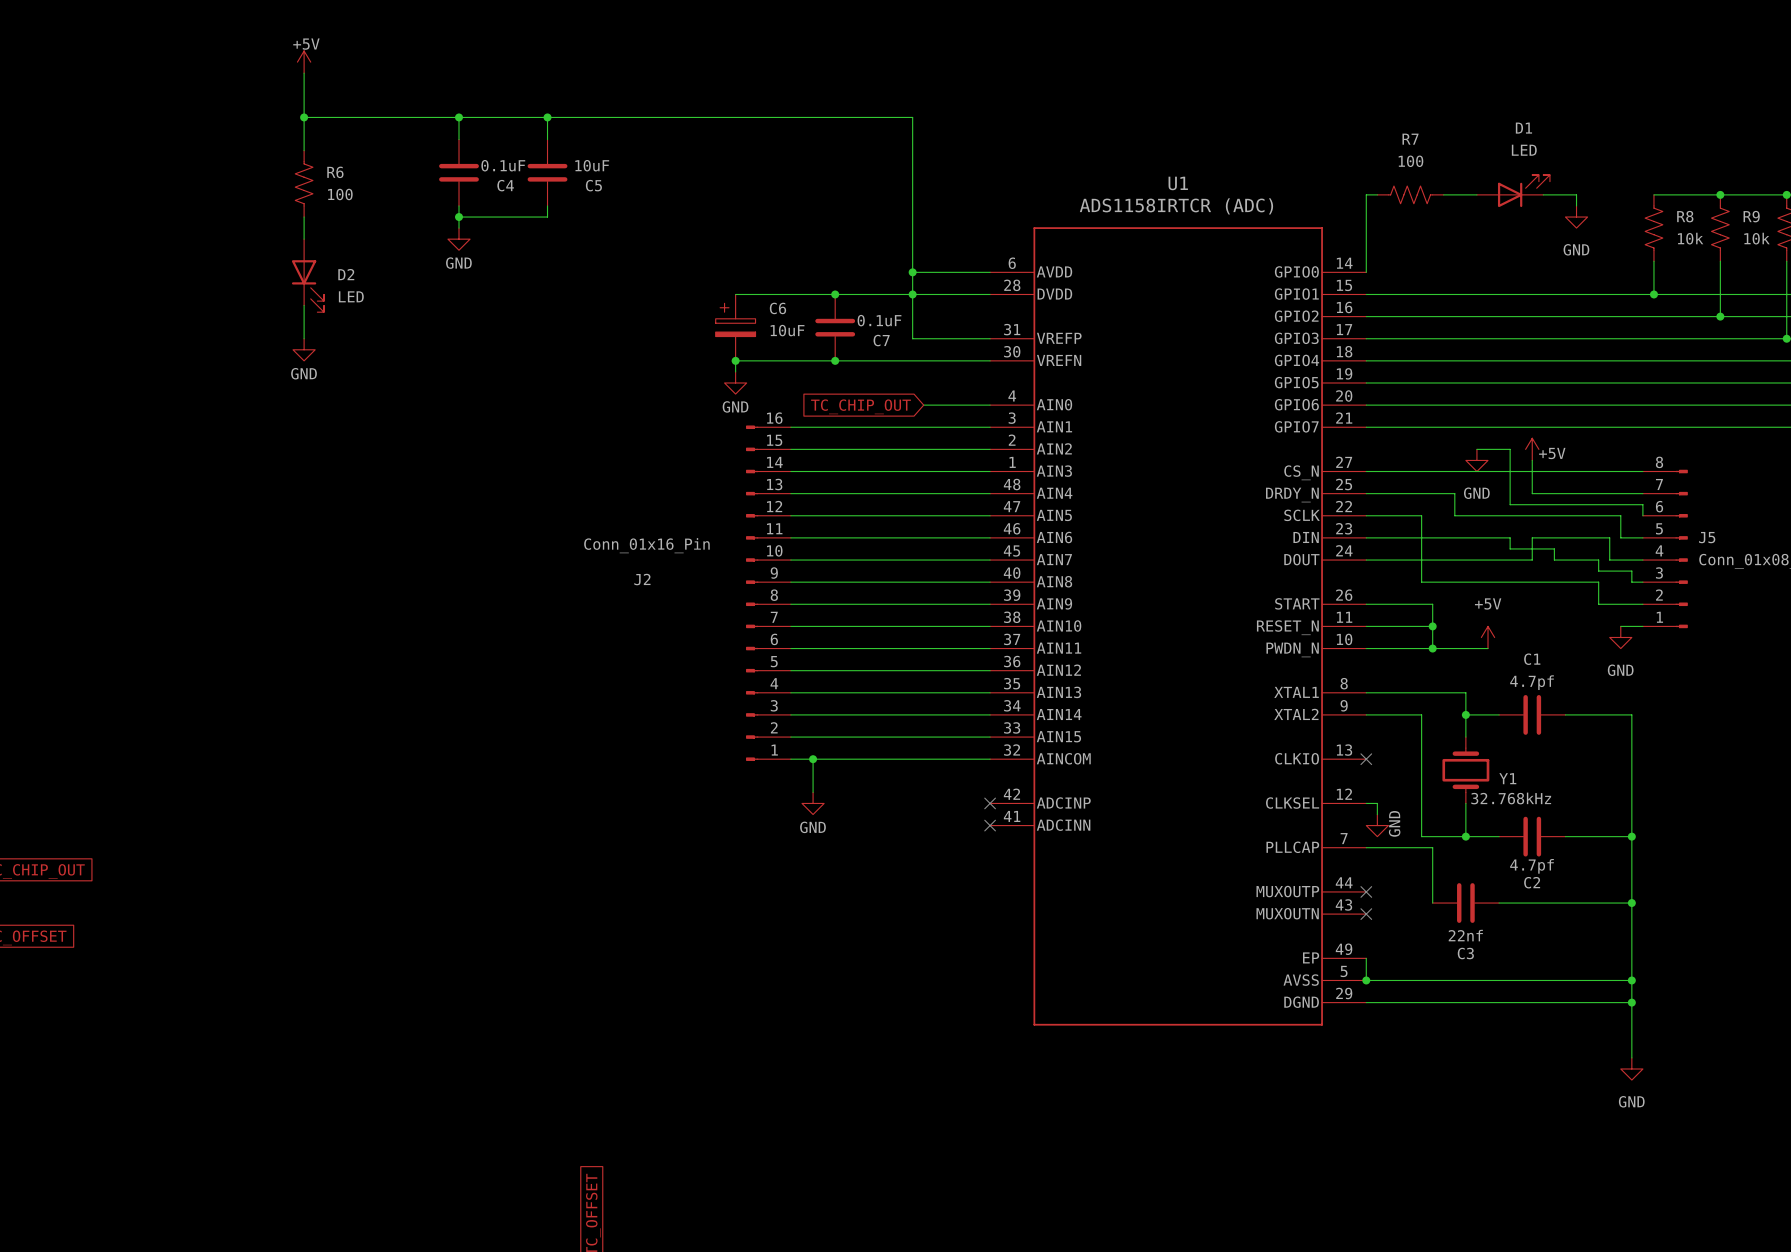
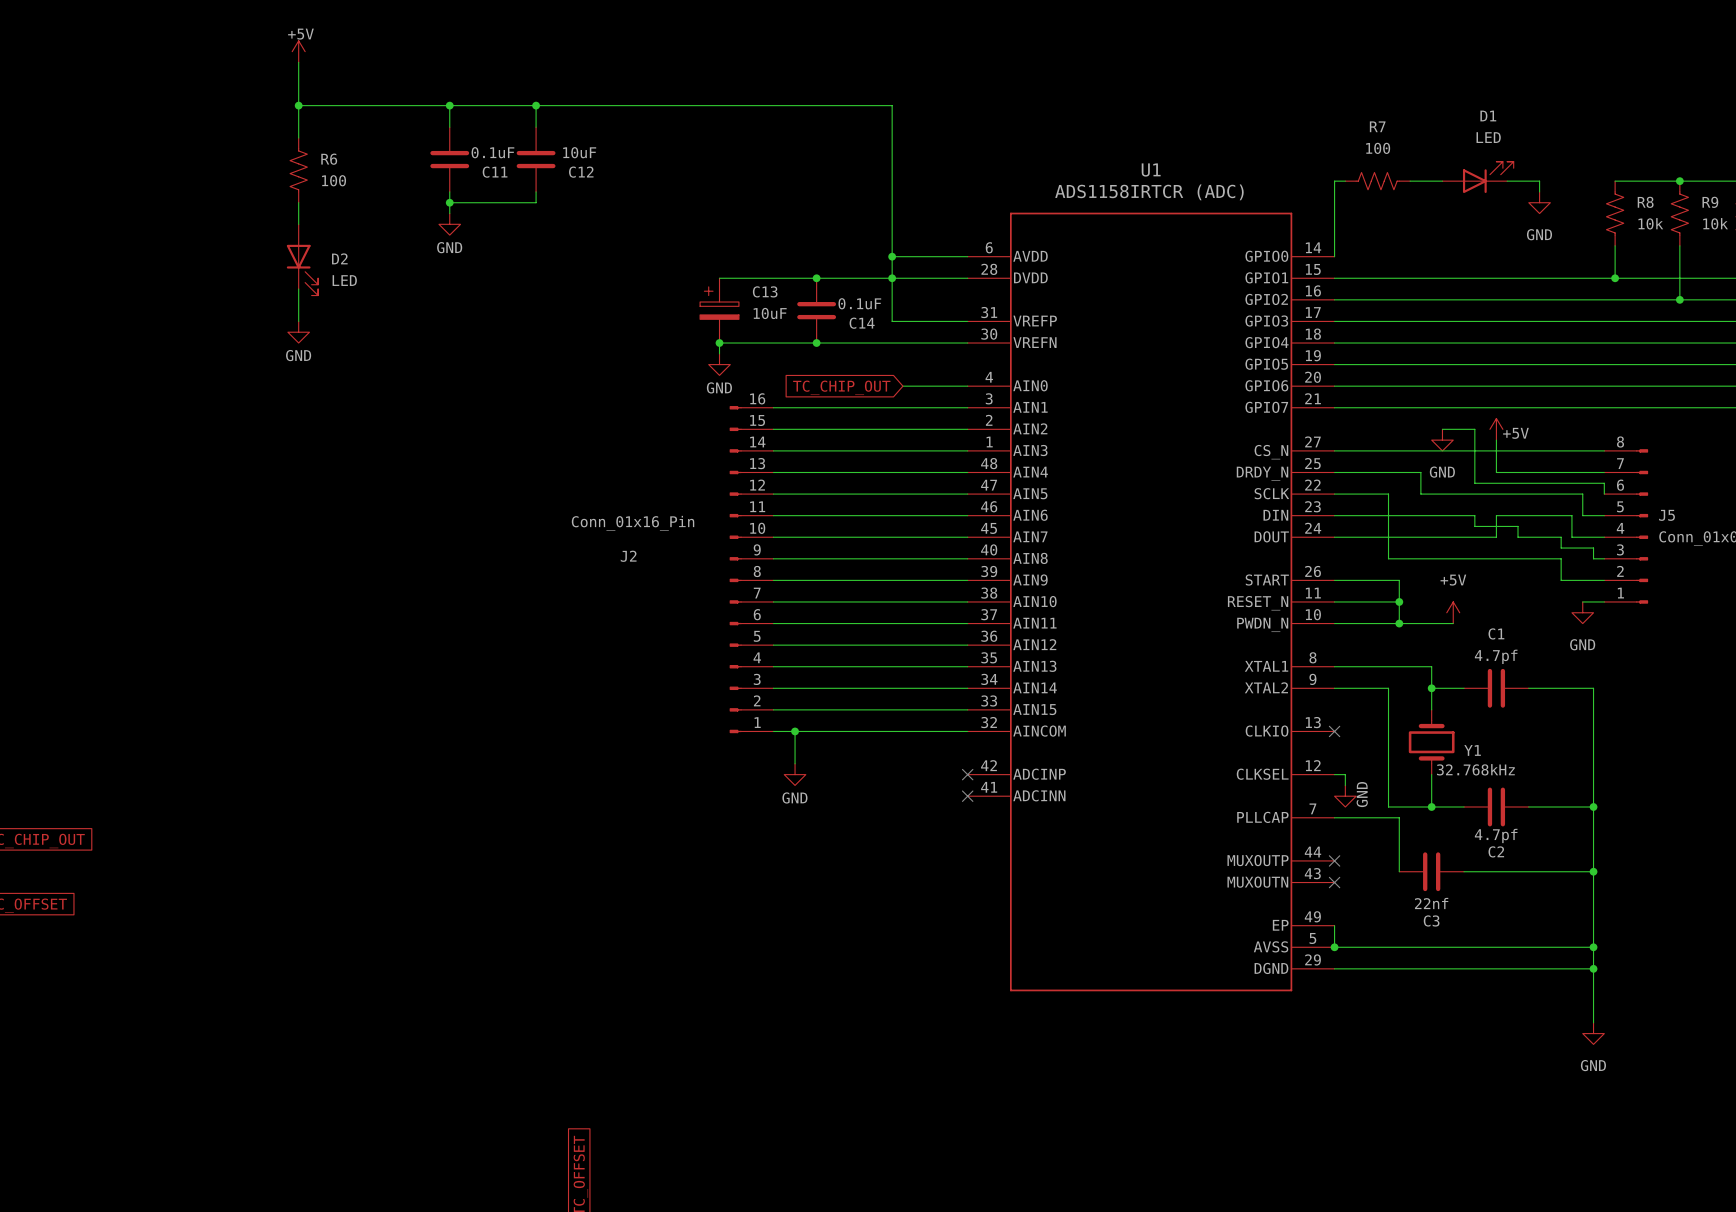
C4 name: C4 (505, 185) -> C11 (495, 172)
C5 name: C5 (593, 185) -> C12 (581, 172)
C6 name: C6 (777, 308) -> C13 (765, 291)
C7 name: C7 (881, 340) -> C14 (862, 323)

